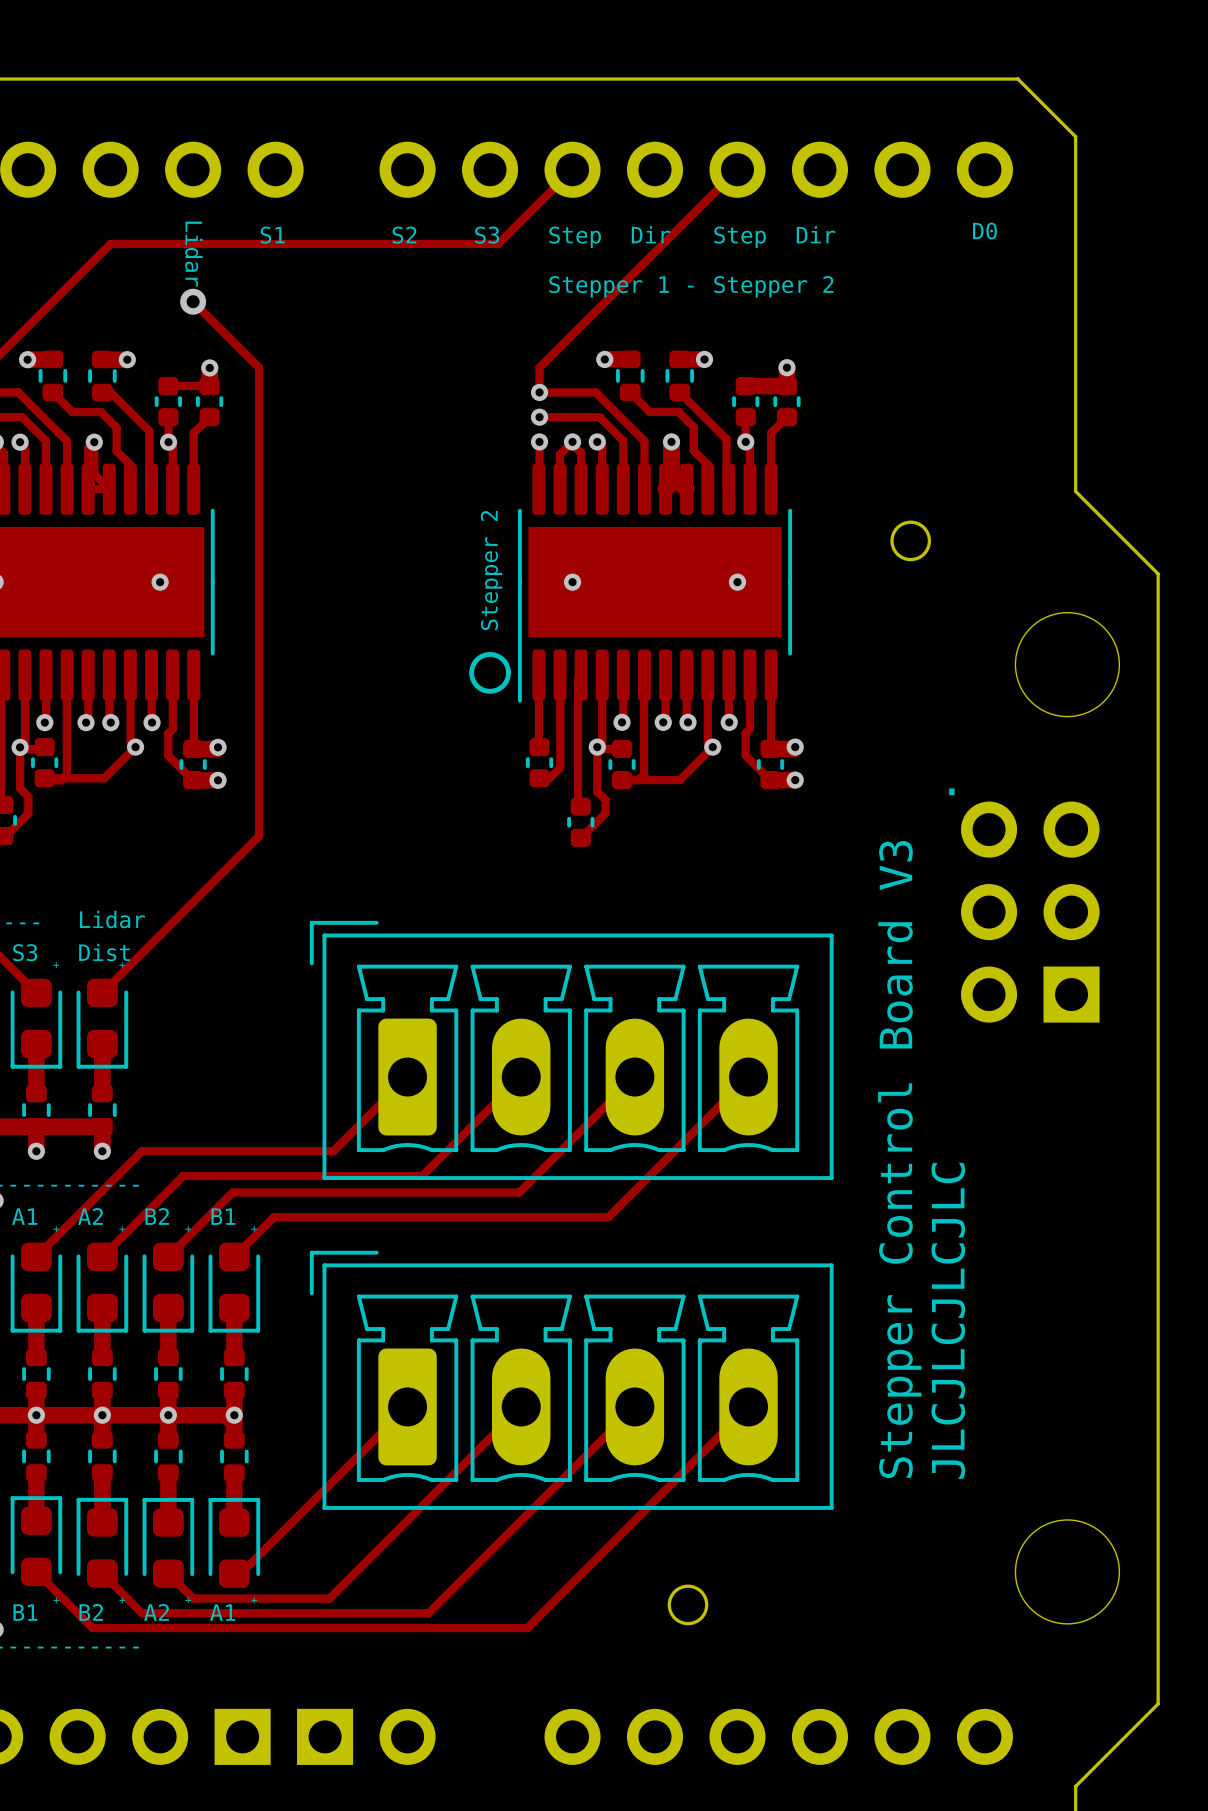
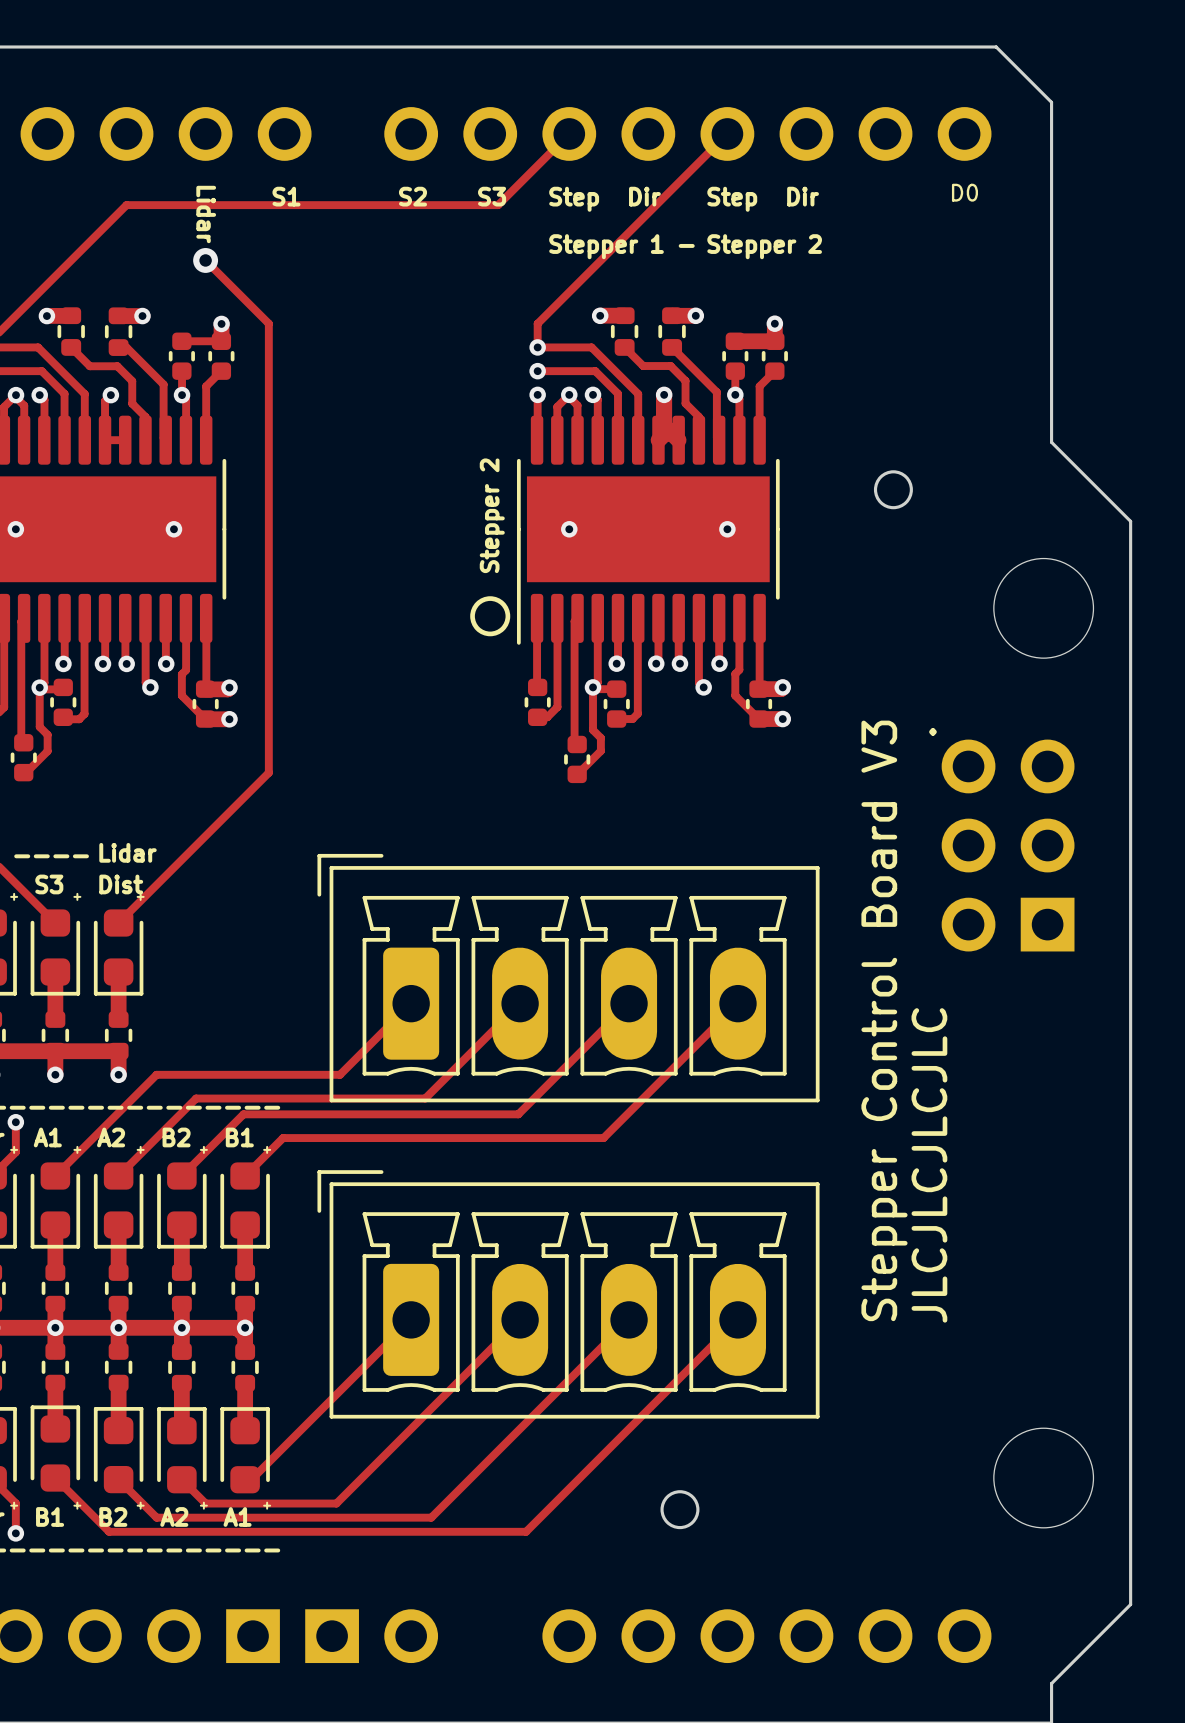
track: (94, 442) (94, 474) (109, 489) -> none
track: (135, 747) (104, 778) (44, 778) -> none
track: (712, 747) (679, 780) (638, 780) -> none
text position: Stepper Control Board V3 (899, 1159) -> Stepper Control Board V3 (884, 1020)
text position: JLCJLCJLCJLC (948, 1320) -> JLCJLCJLCJLC (929, 1165)

